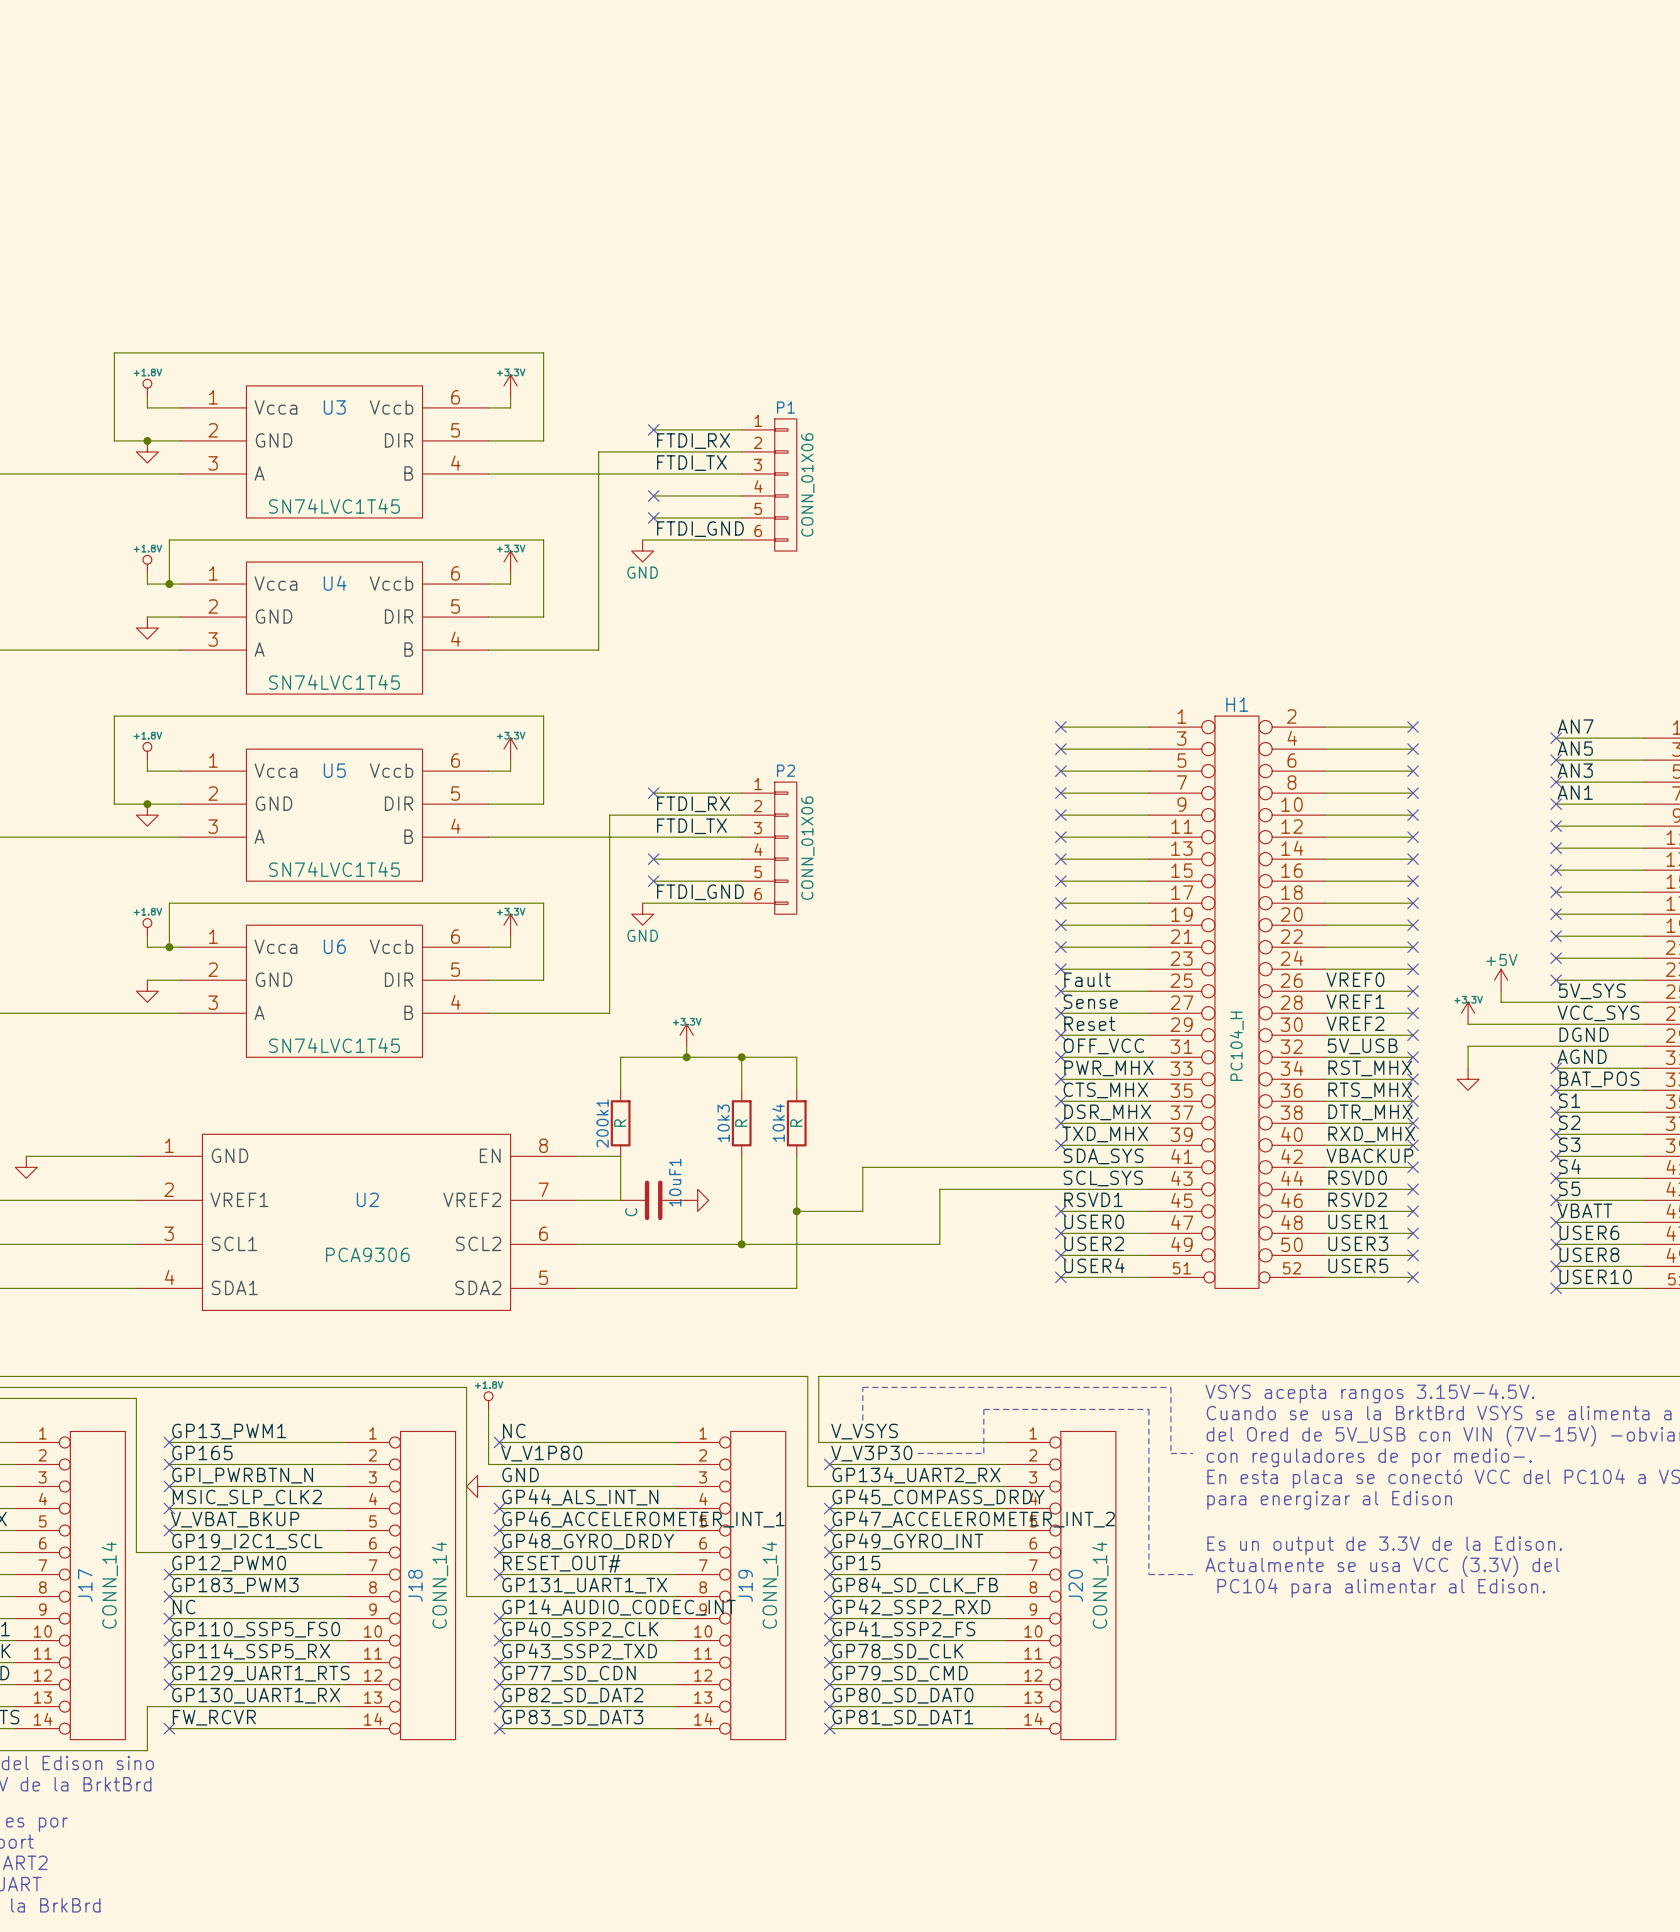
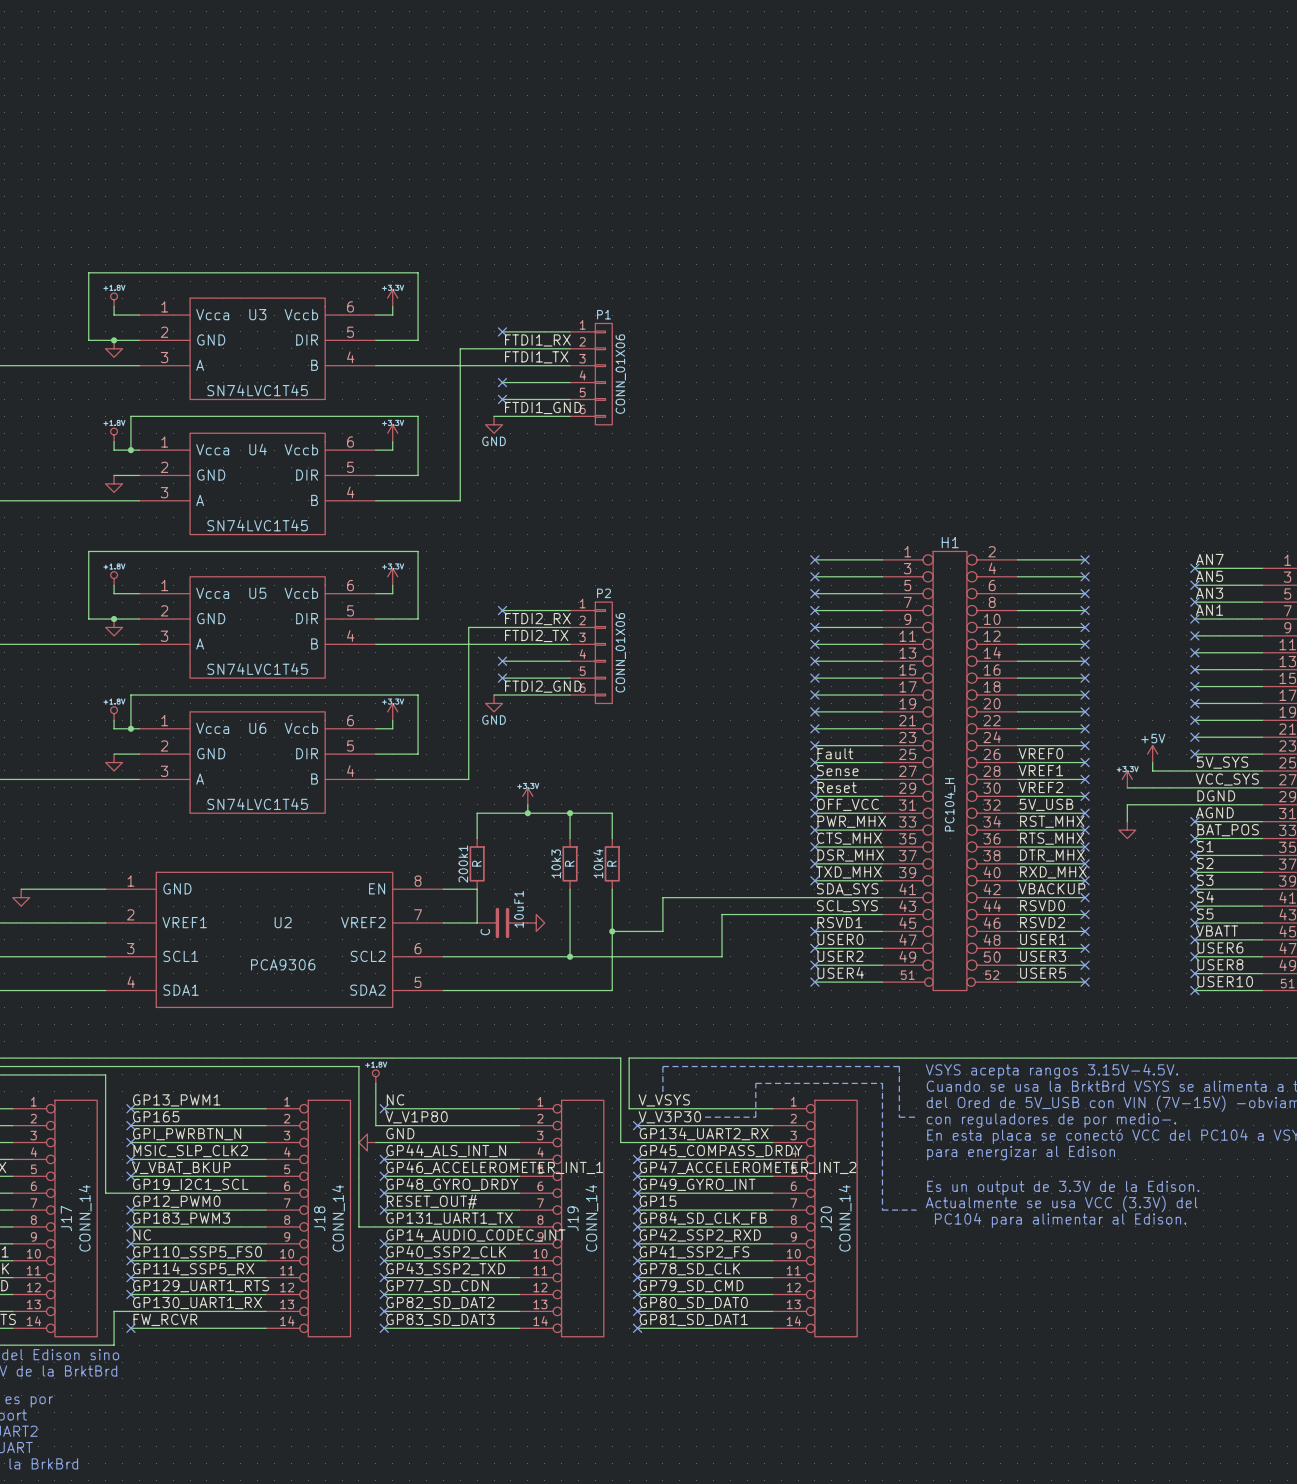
label: FTDI_RX (693, 441) -> FTDI1_RX (537, 340)
label: FTDI_TX (691, 463) -> FTDI1_TX (536, 357)
label: FTDI_GND (700, 529) -> FTDI1_GND (543, 407)
label: FTDI_RX (693, 804) -> FTDI2_RX (537, 619)
label: FTDI_TX (691, 826) -> FTDI2_TX (536, 635)
label: FTDI_GND (700, 892) -> FTDI2_GND (543, 686)

